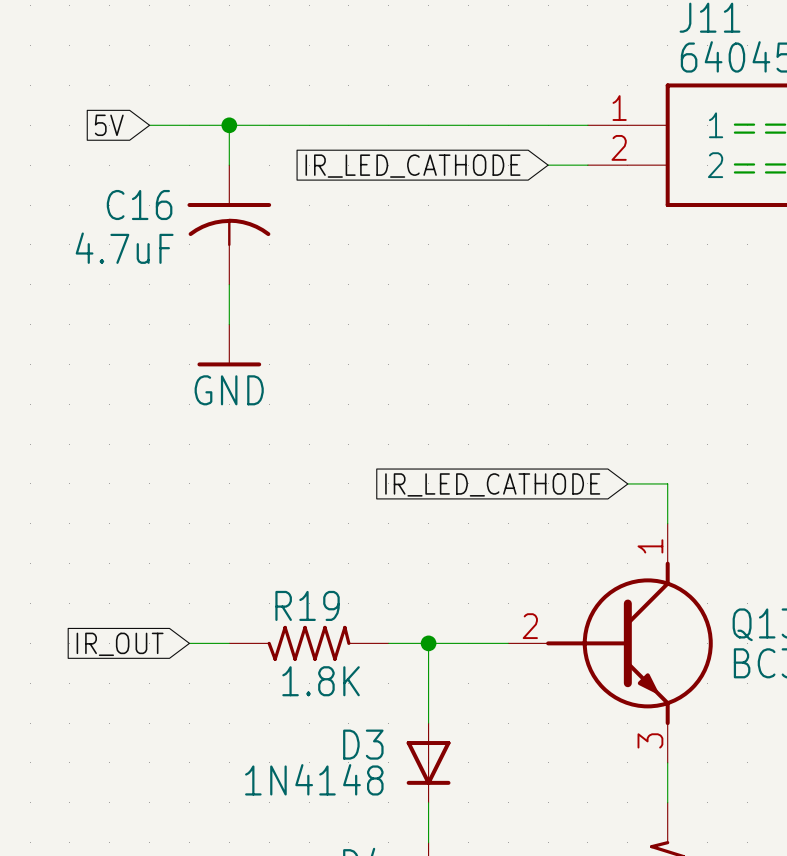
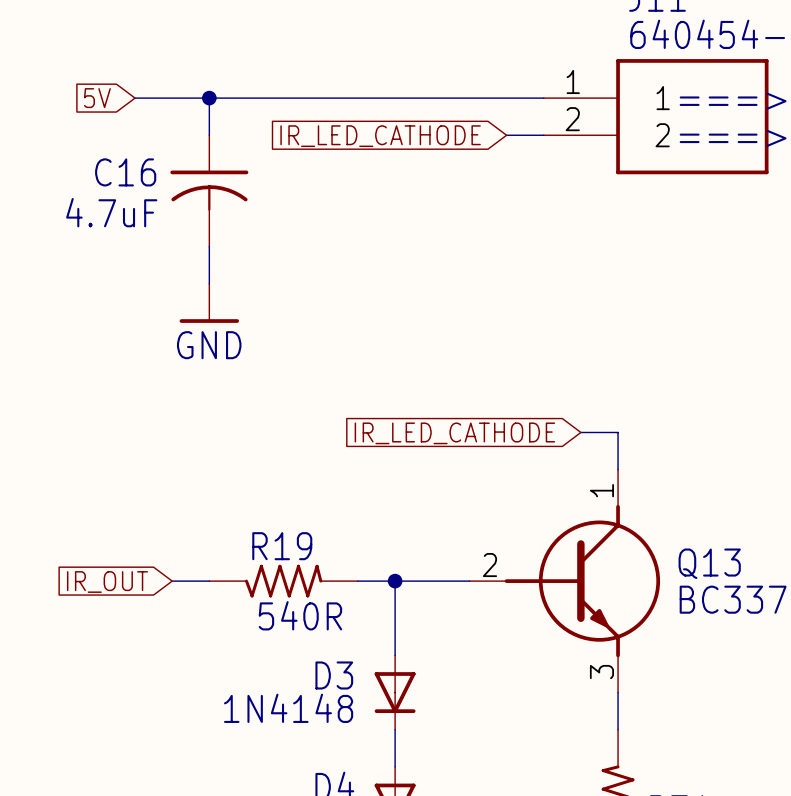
R19 value: 1.8K (321, 681) -> 540R (300, 615)

